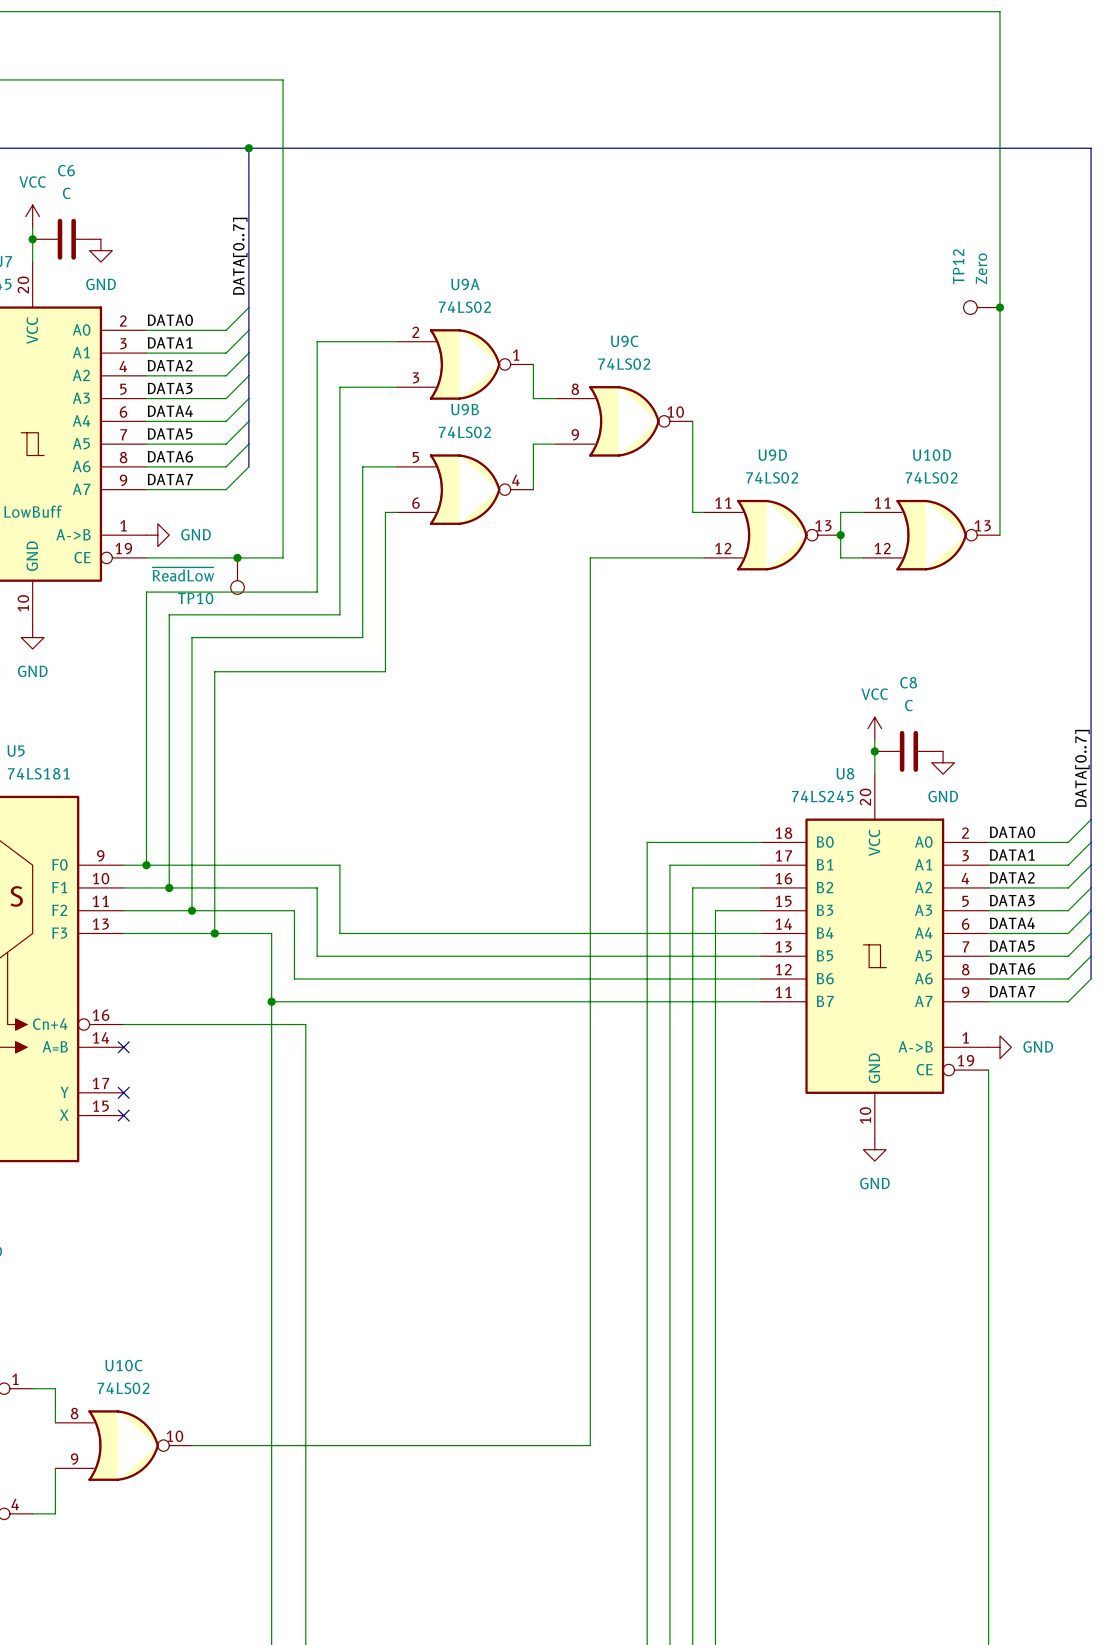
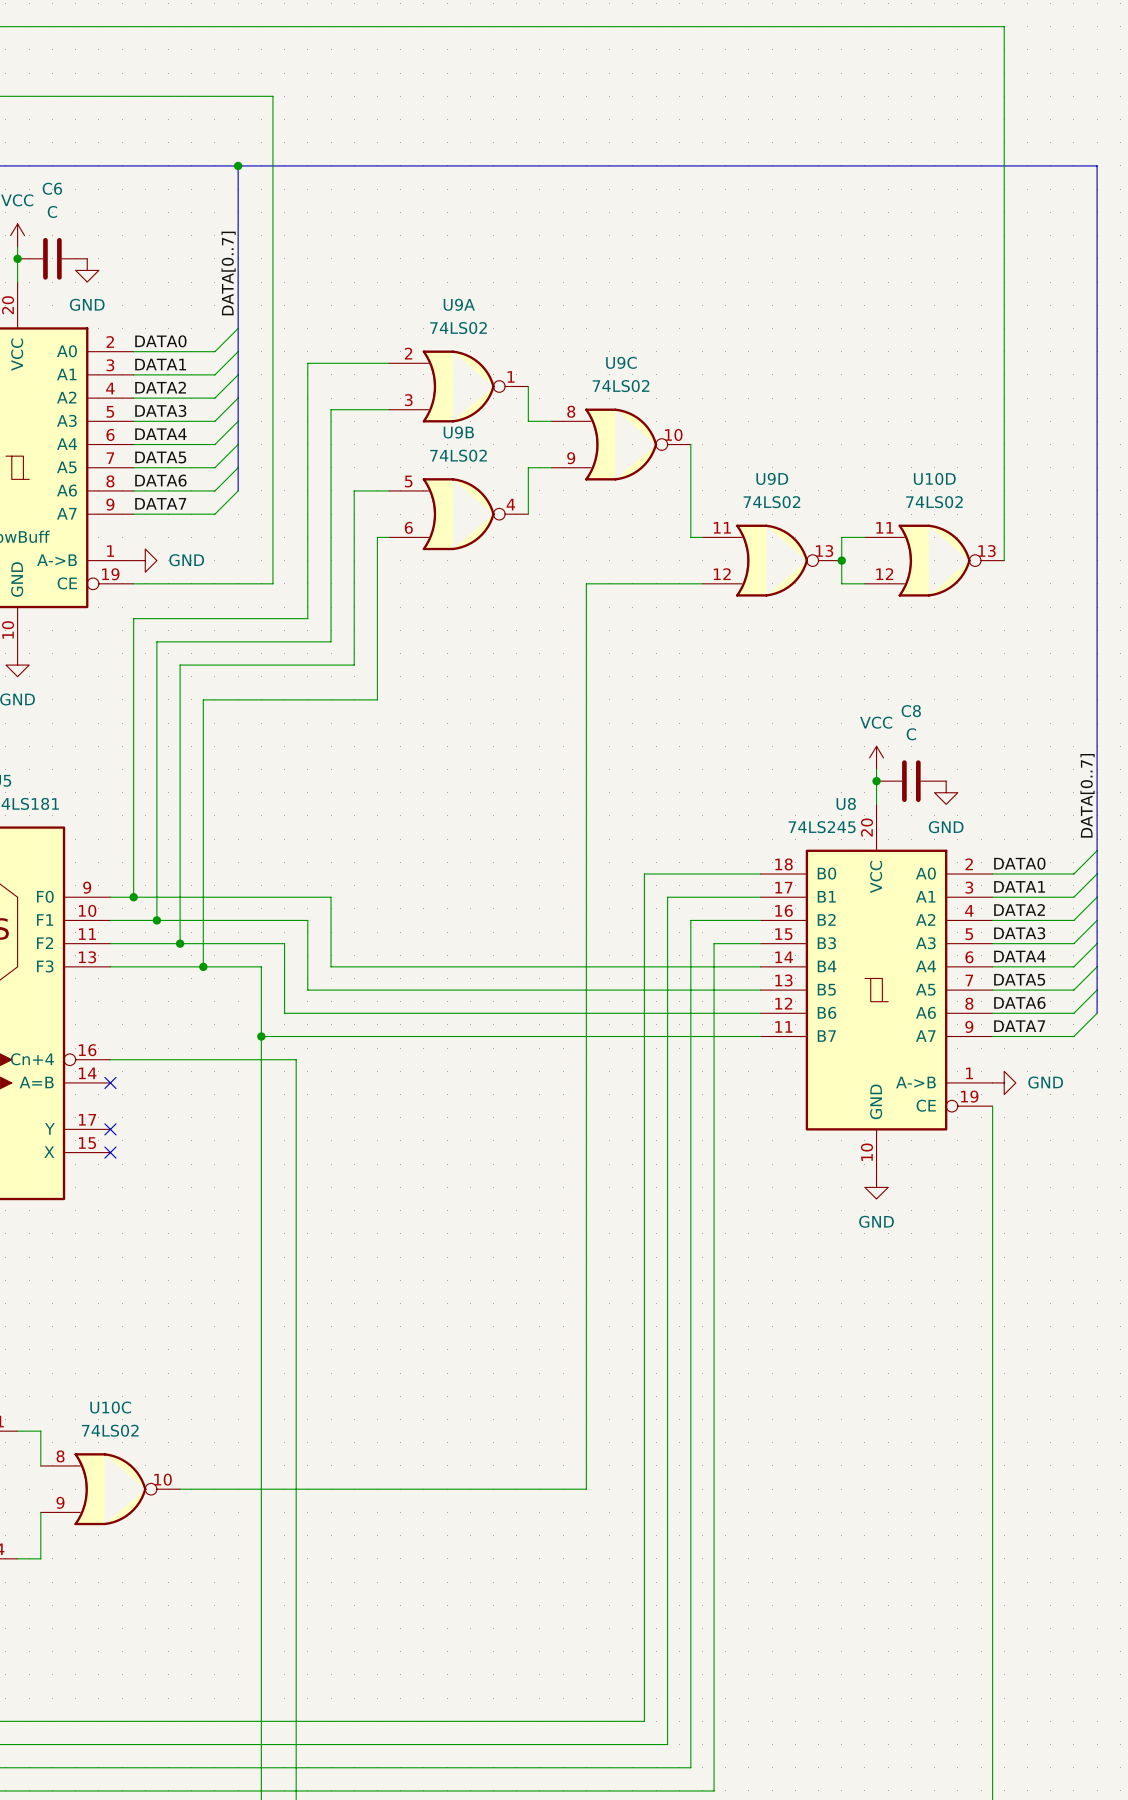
TP12: Zero (981, 307) -> none
junction: (999, 307) -> none
junction: (237, 557) -> none
TP10: ~{ReadLow} (237, 576) -> none

